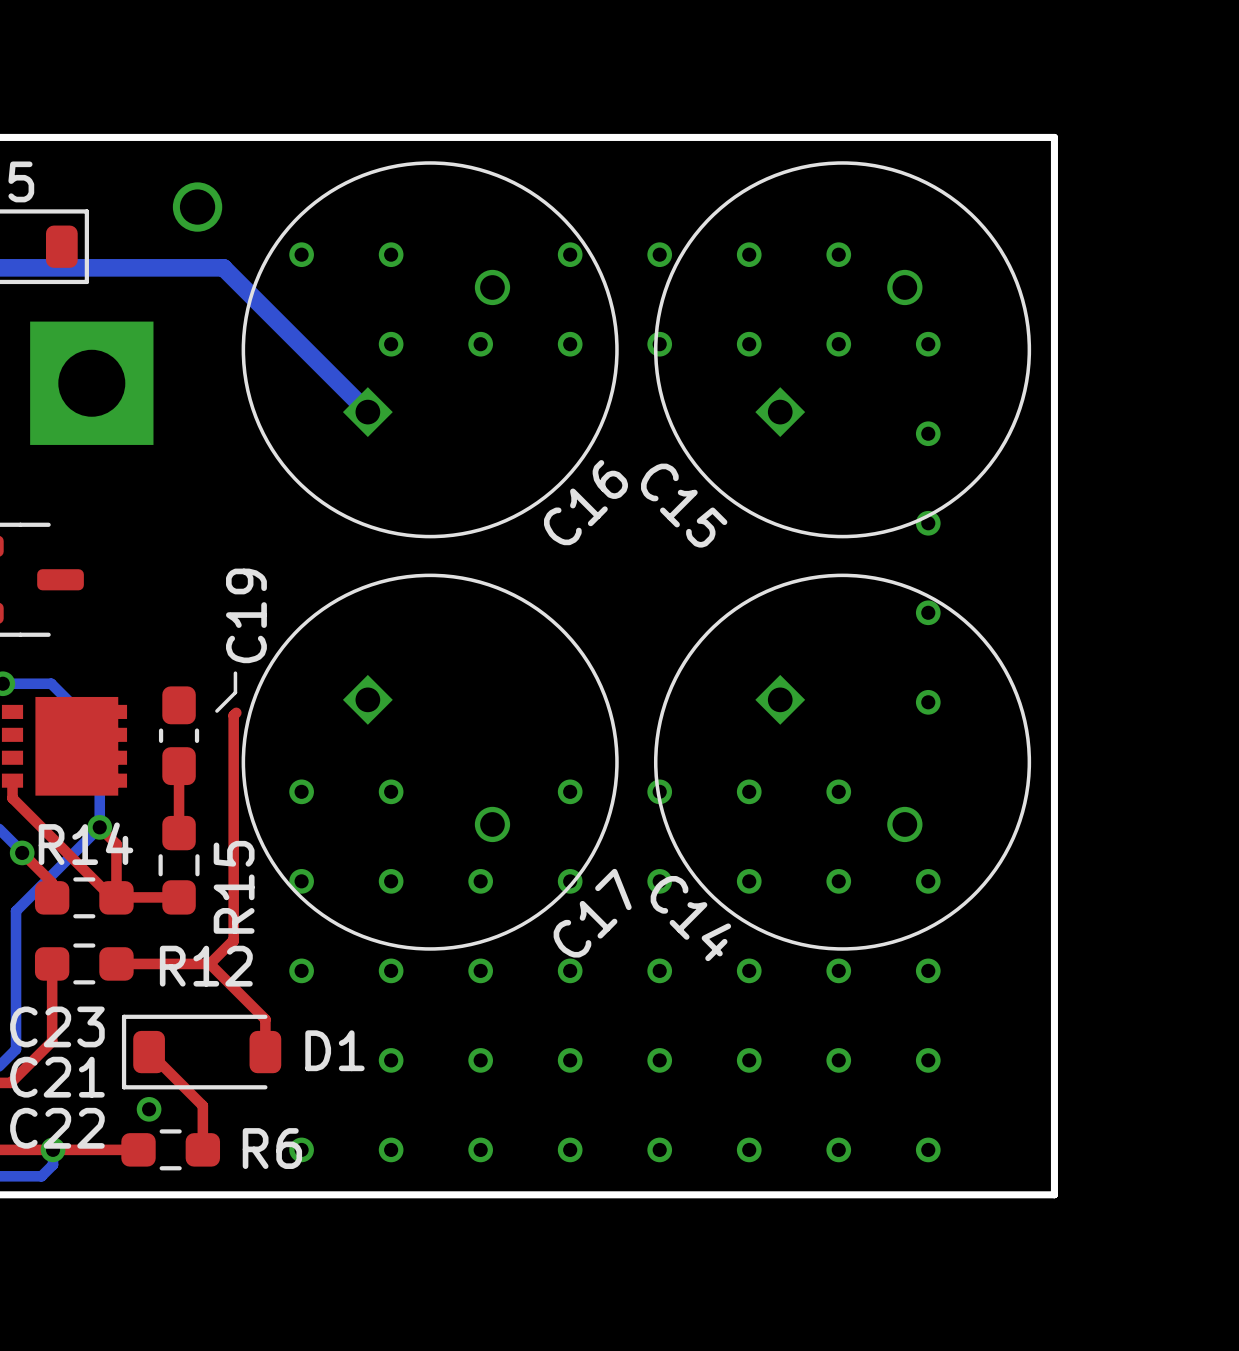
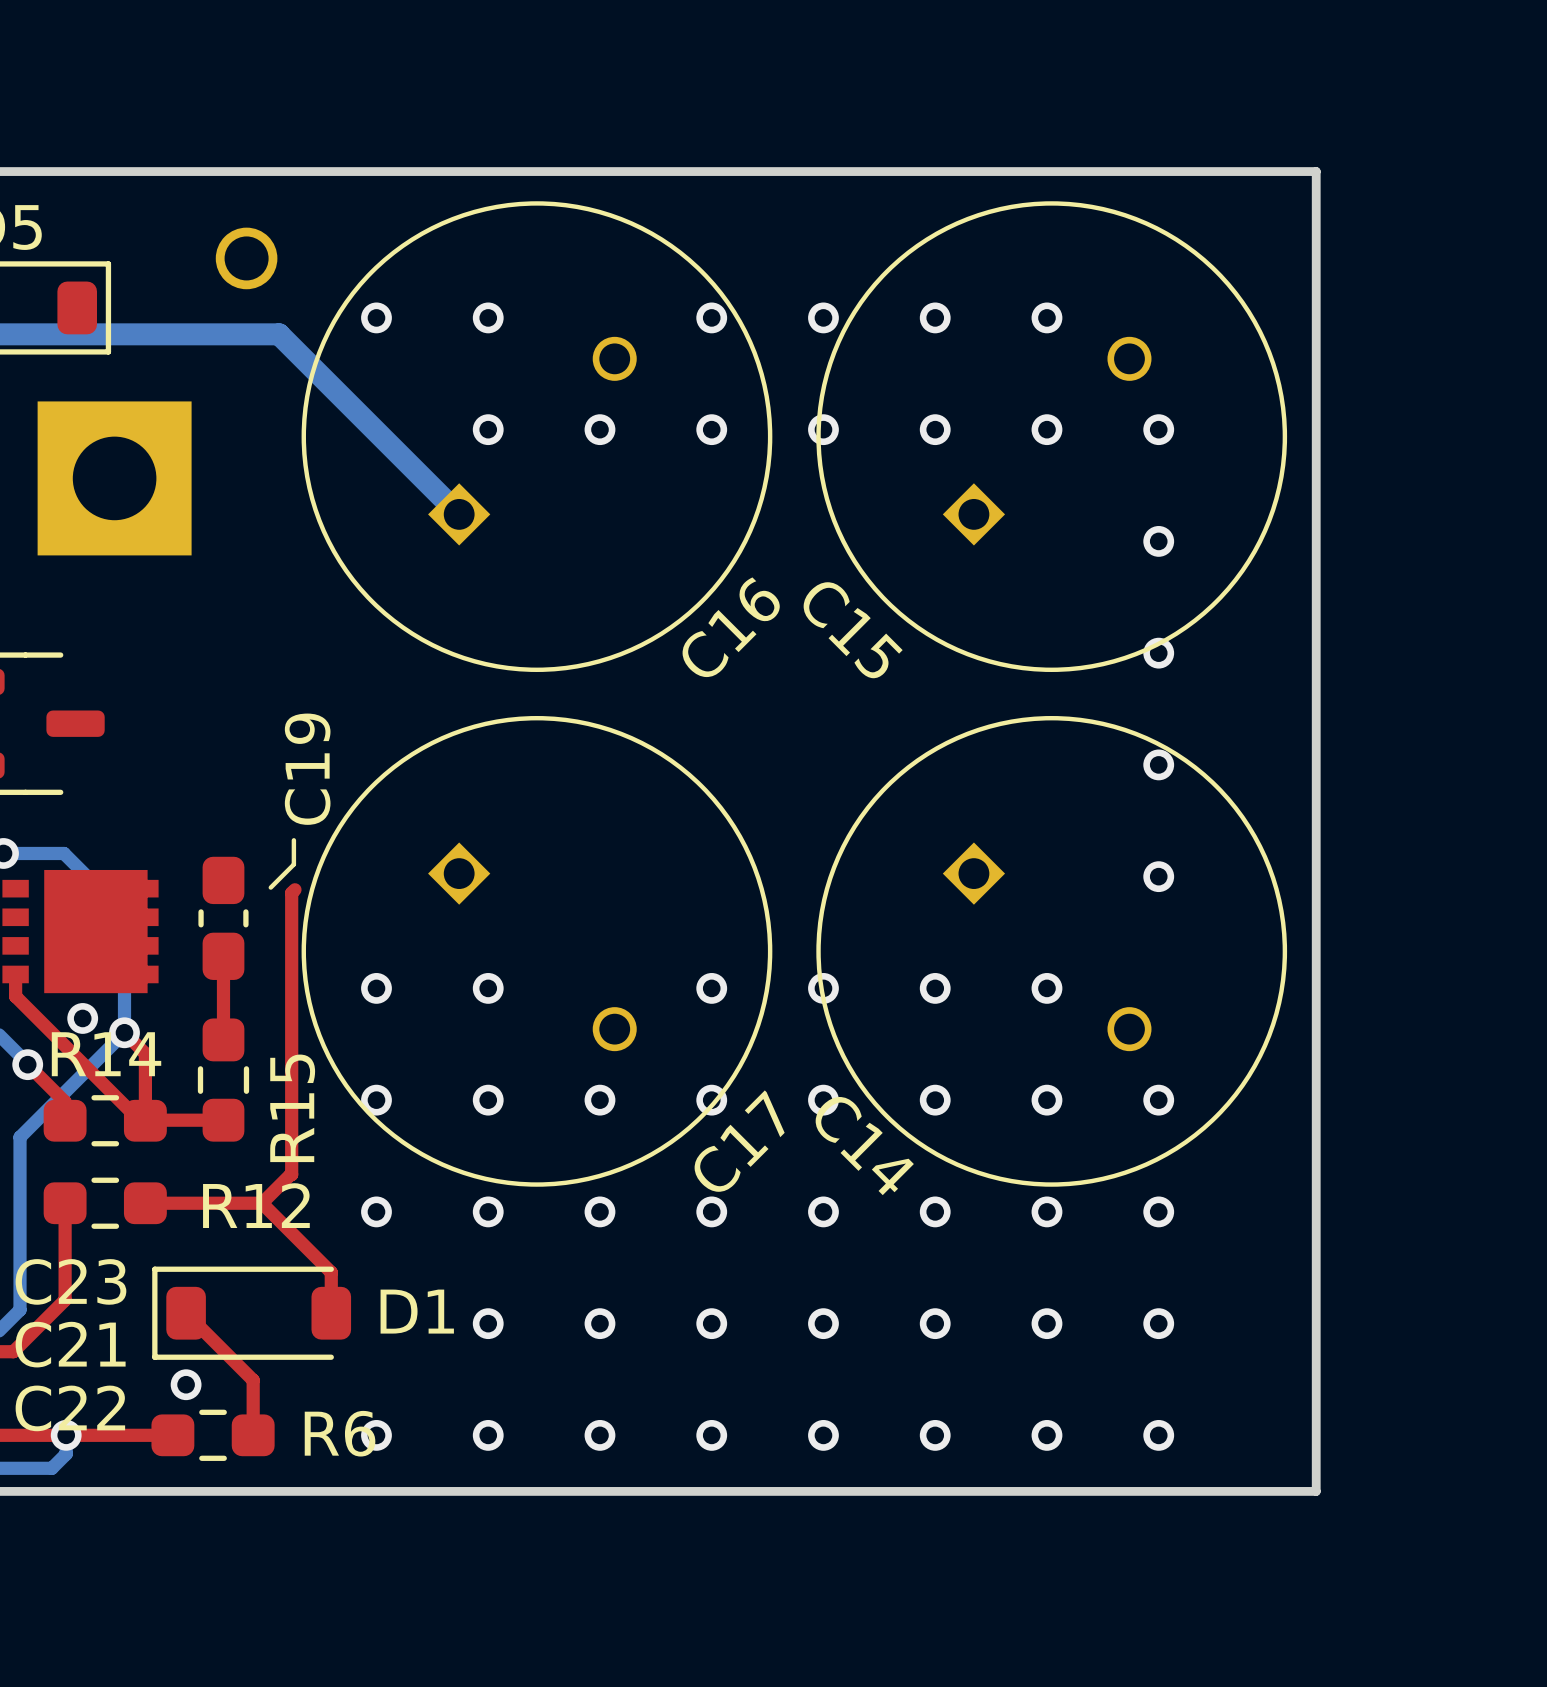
via: none -> (82, 1018)

